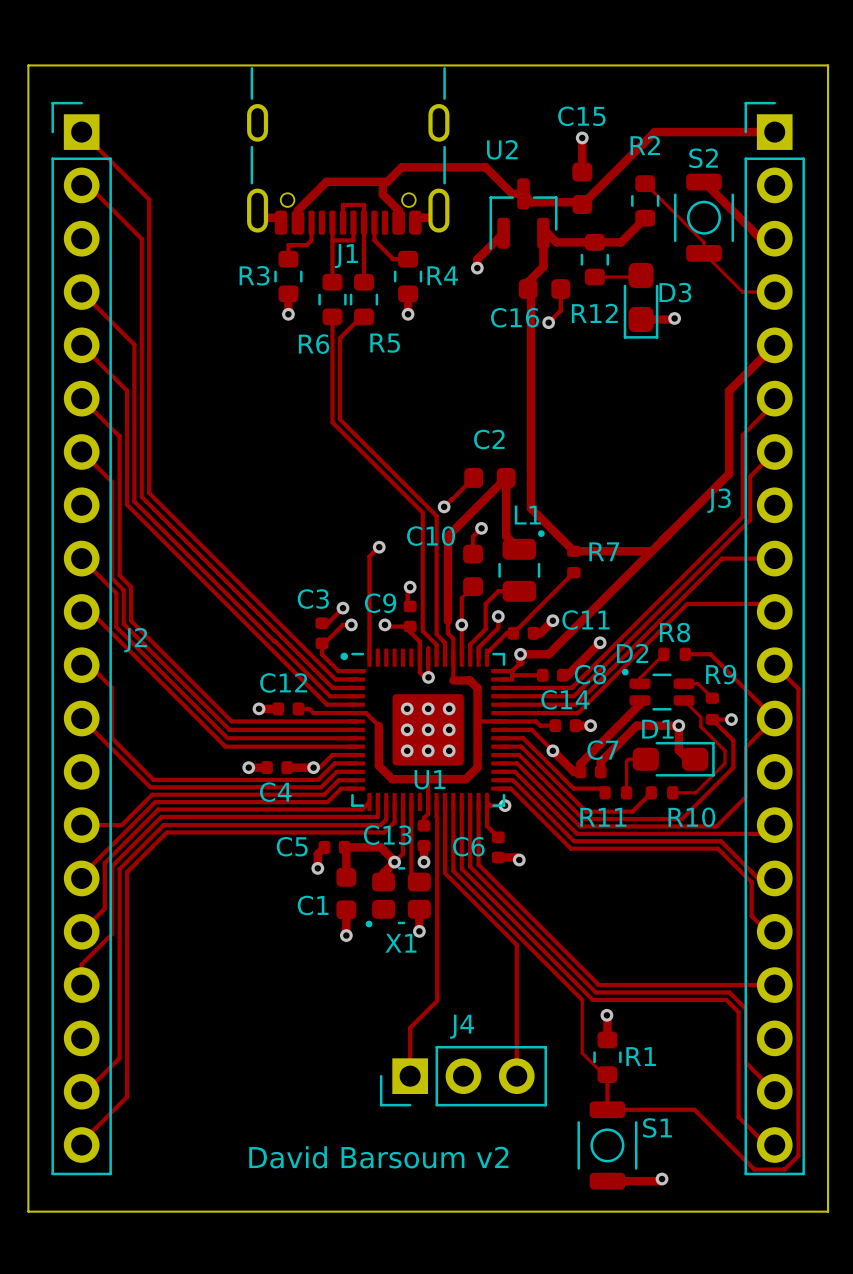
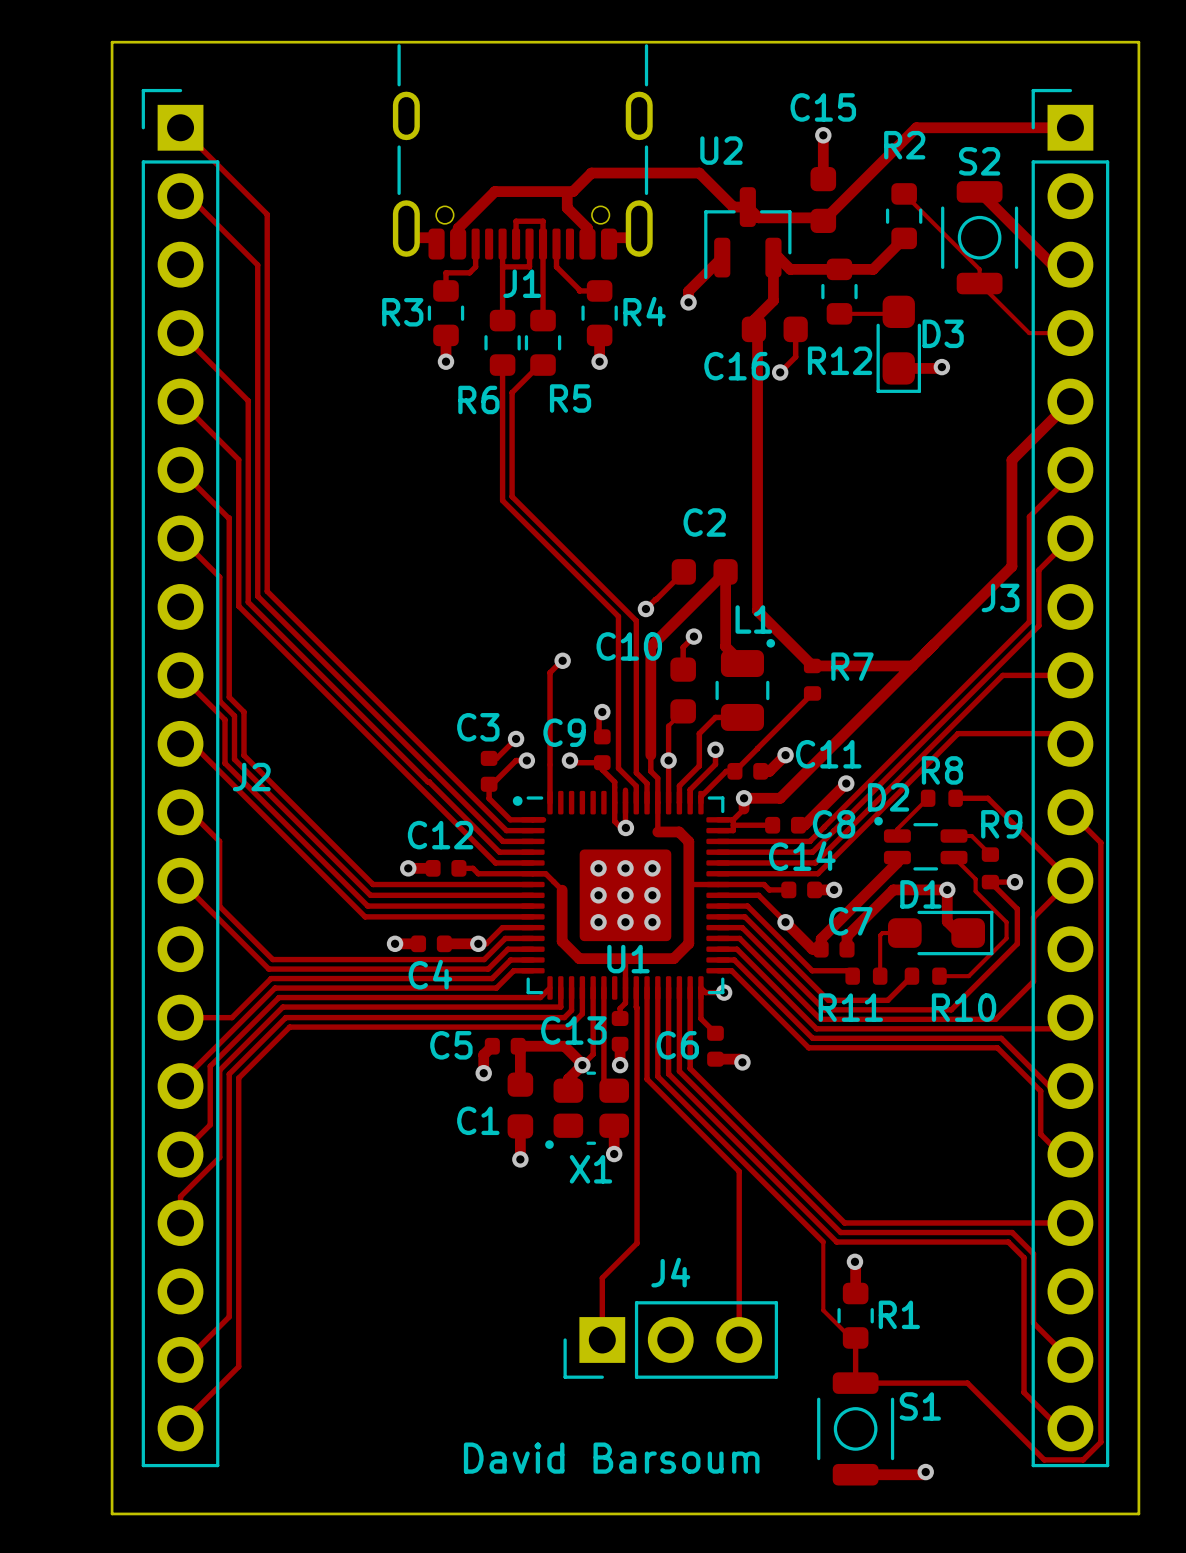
text: David Barsoum v2 (378, 1157) -> David Barsoum (611, 1458)

